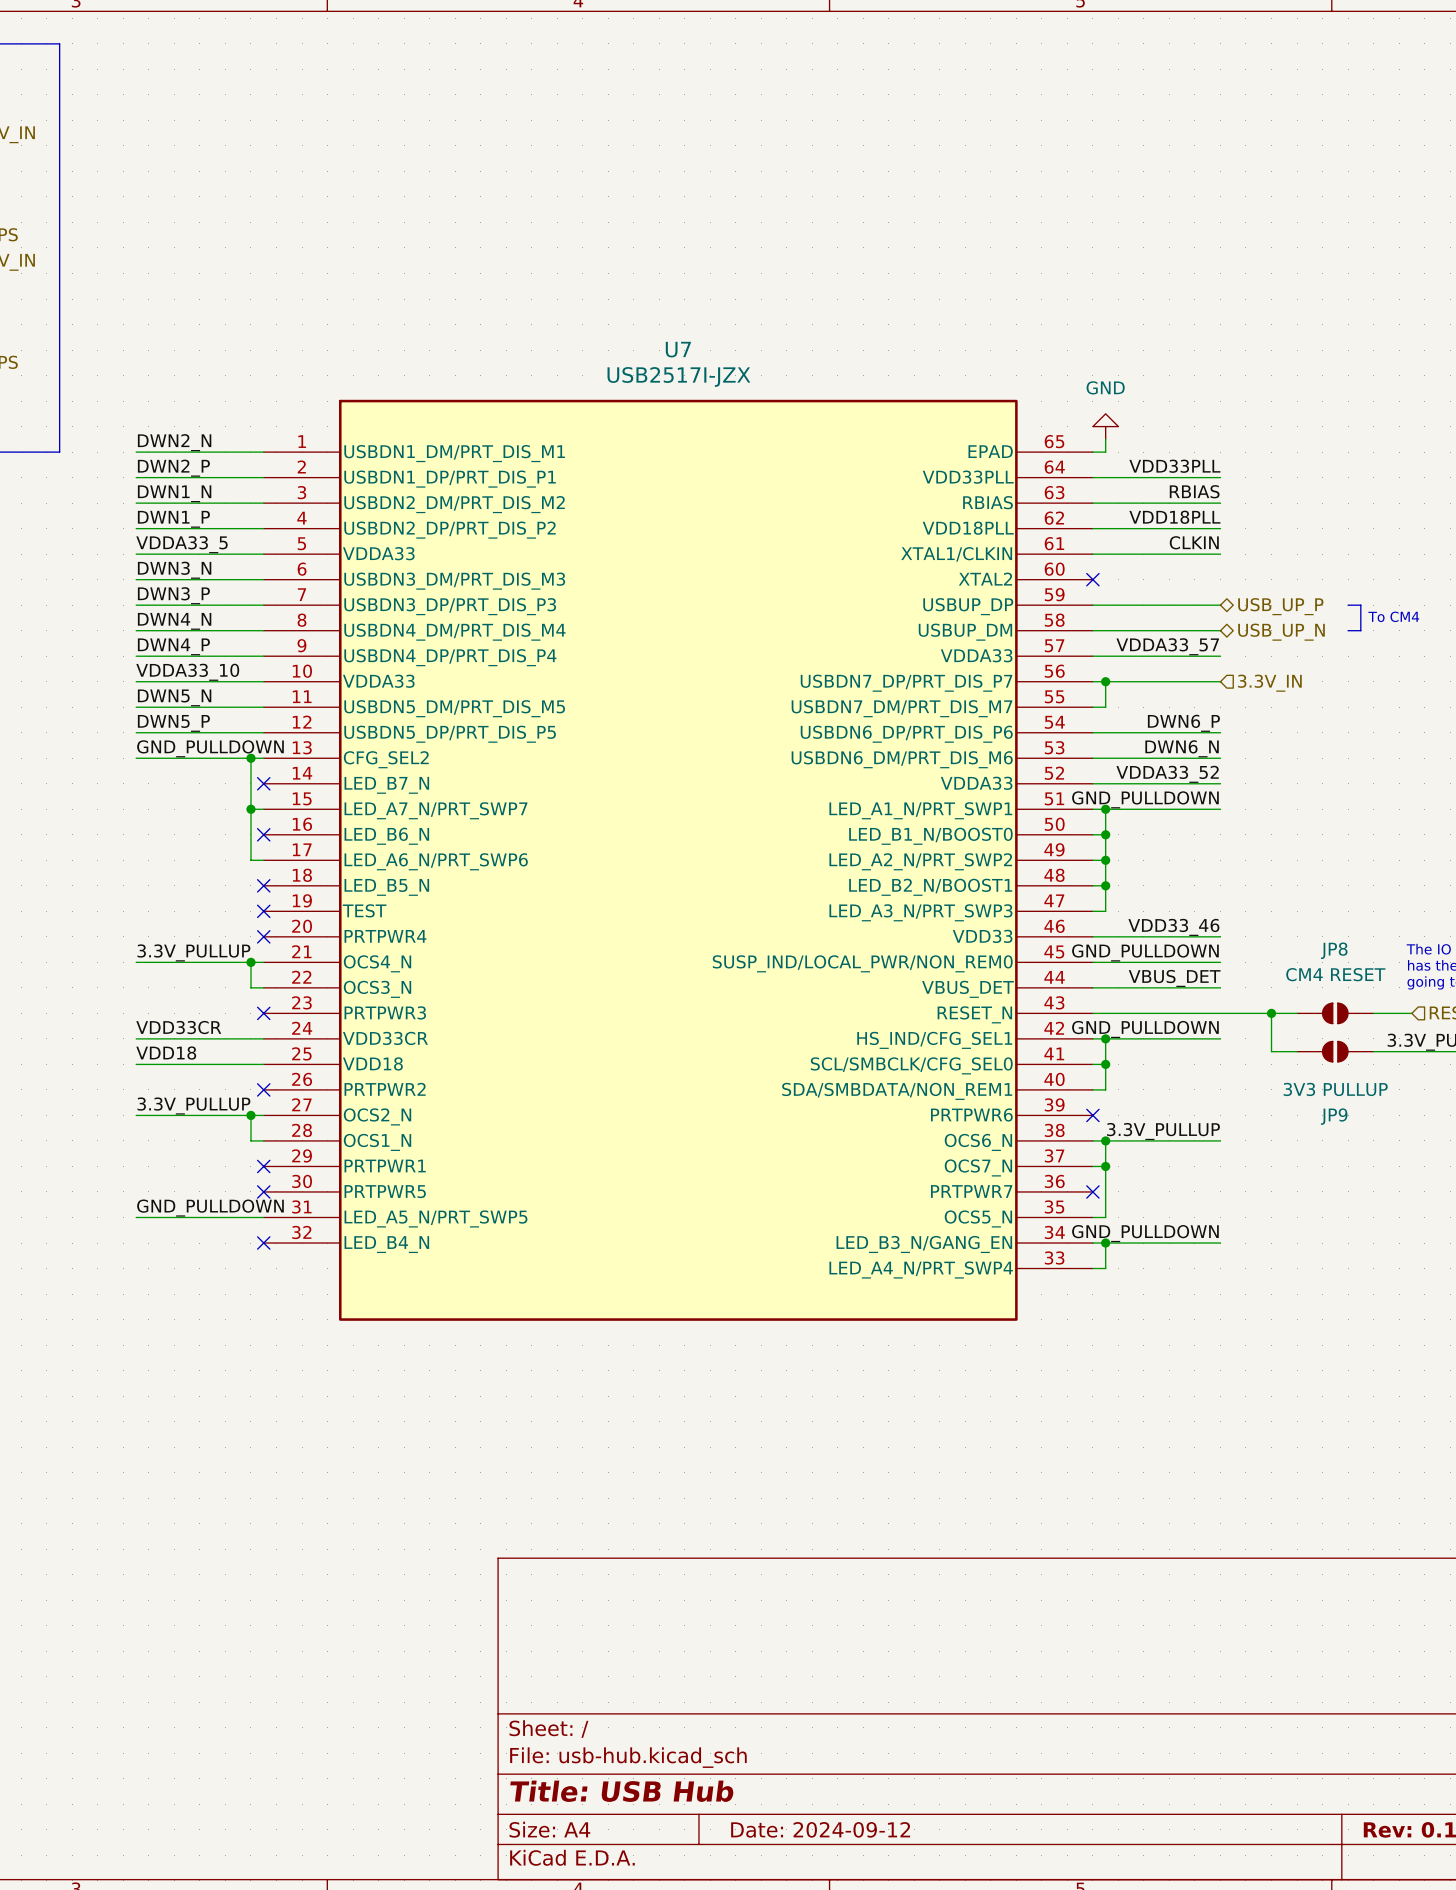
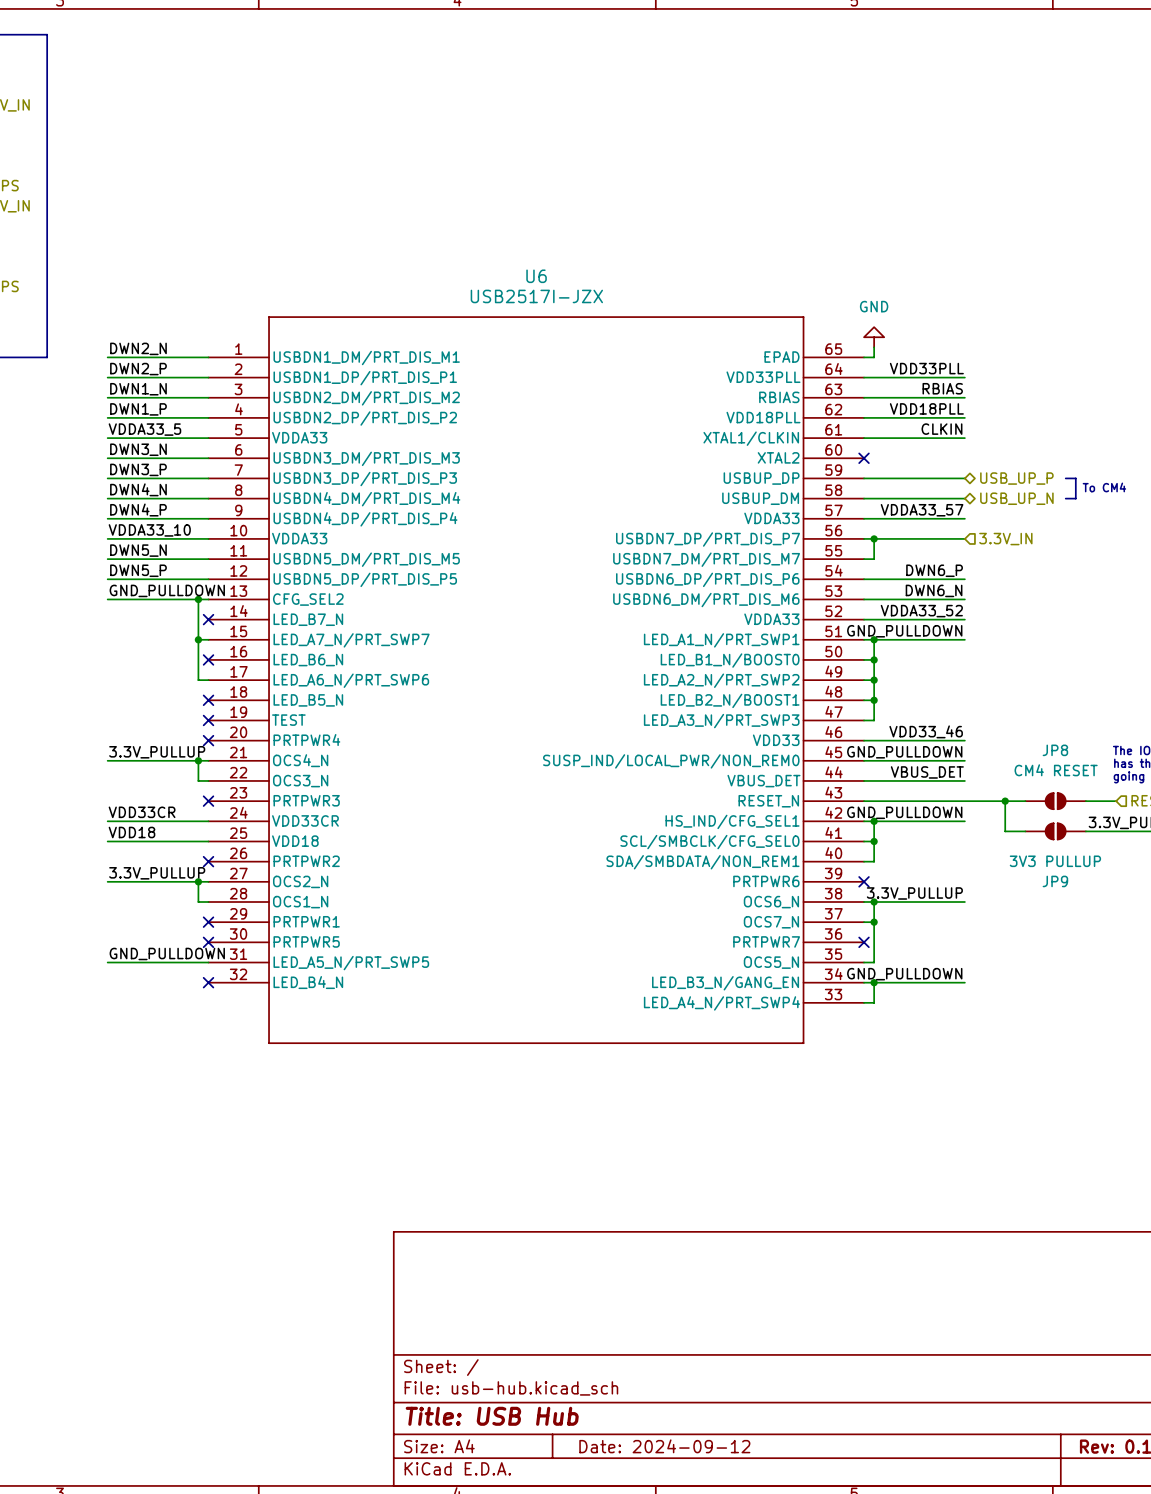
U7: USB2517I-JZX (678, 860) -> none
U6: none -> USB2517I-JZX (536, 680)

